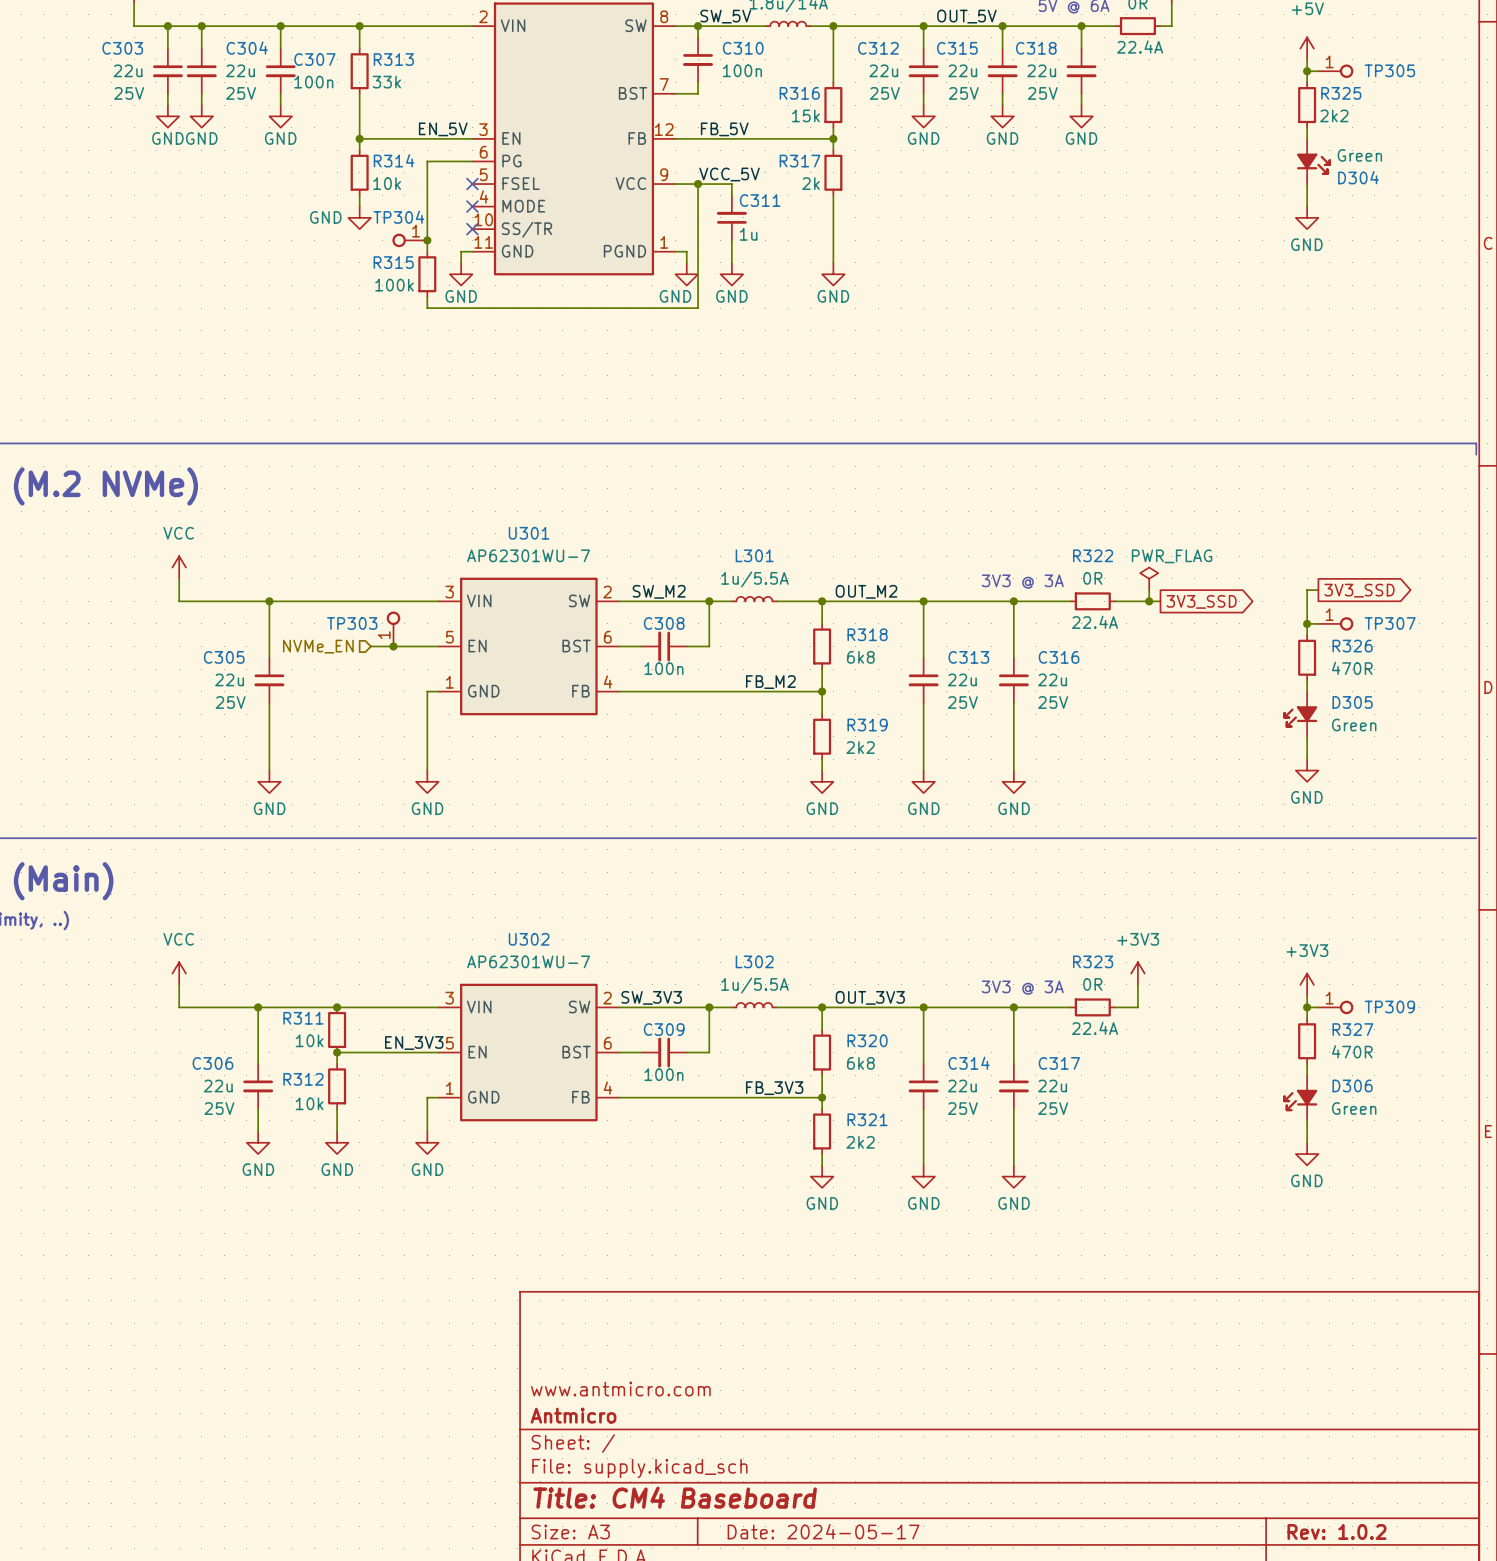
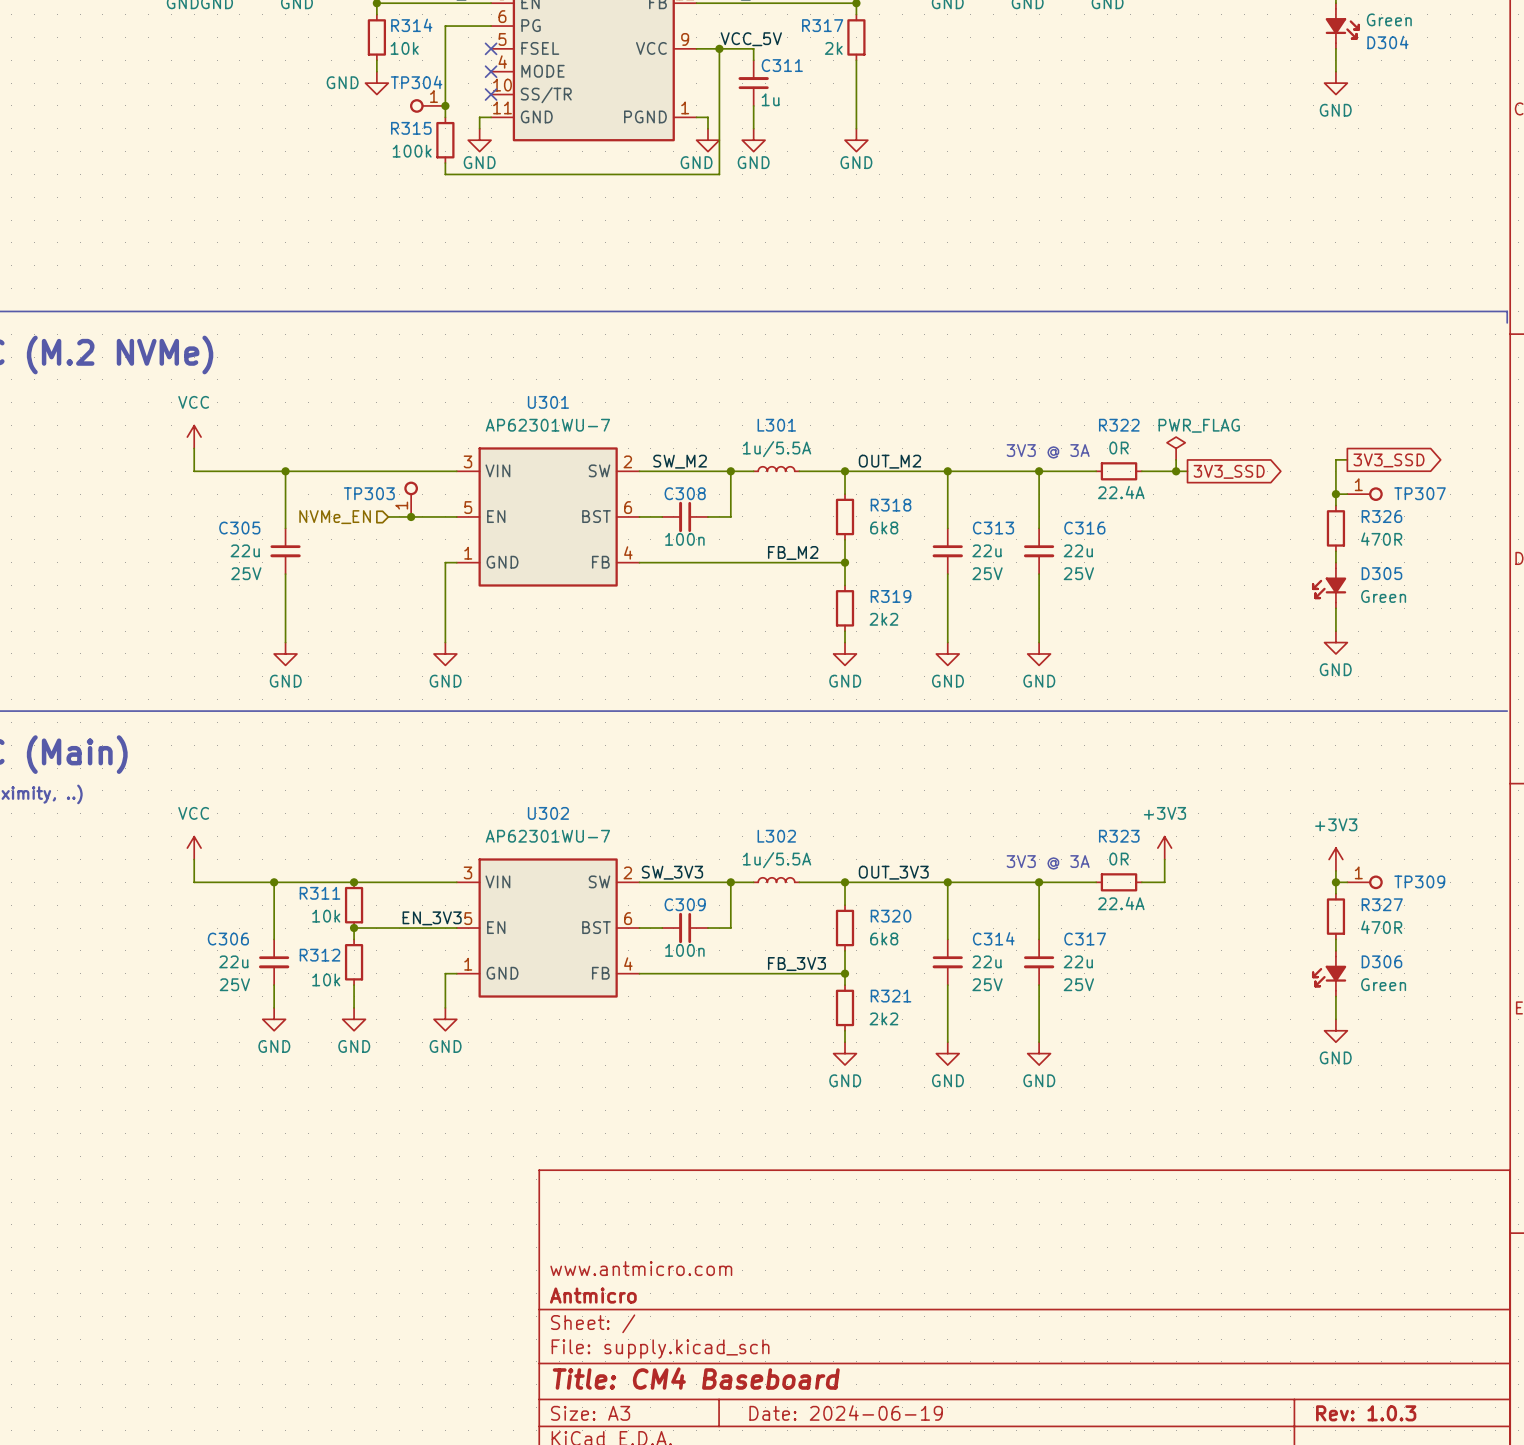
title block: Date: 2024-05-17 (823, 1531) -> Date: 2024-06-19 (846, 1413)
title block: Rev: 1.0.2 (1336, 1531) -> Rev: 1.0.3 (1366, 1413)

